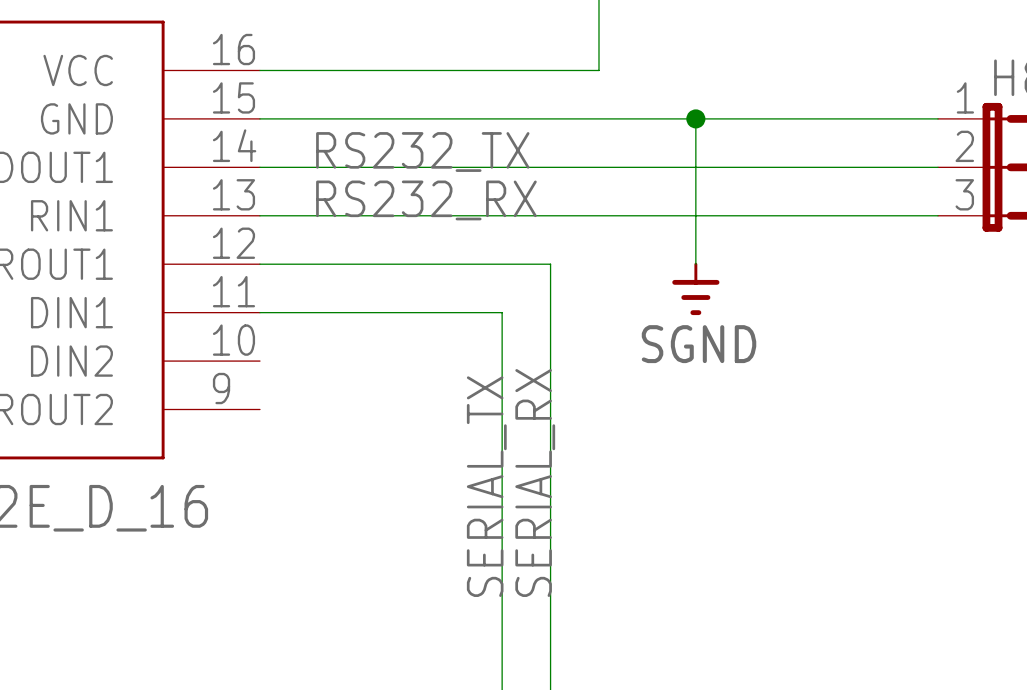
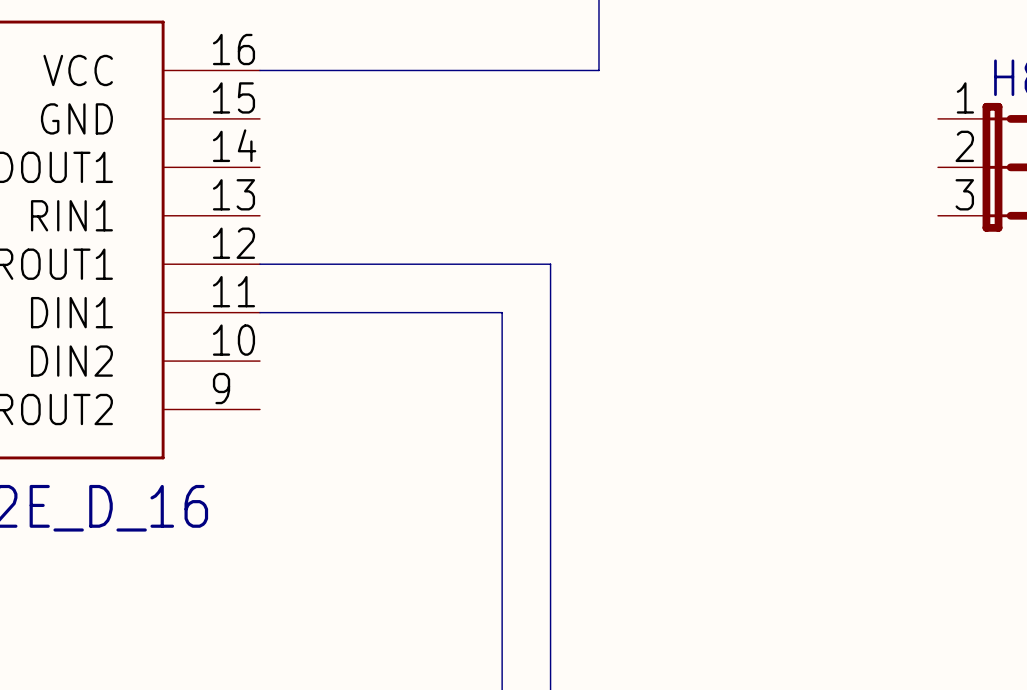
wire: (259, 118) (938, 118) -> none
wire: (695, 118) (695, 264) -> none
junction: (695, 118) -> none
label: RS232_TX (422, 152) -> none
wire: (259, 167) (938, 167) -> none
label: RS232_RX (426, 200) -> none
wire: (259, 215) (938, 215) -> none
power symbol: SGND (695, 288) -> none
label: SERIAL_RX (535, 483) -> none
label: SERIAL_TX (486, 486) -> none

